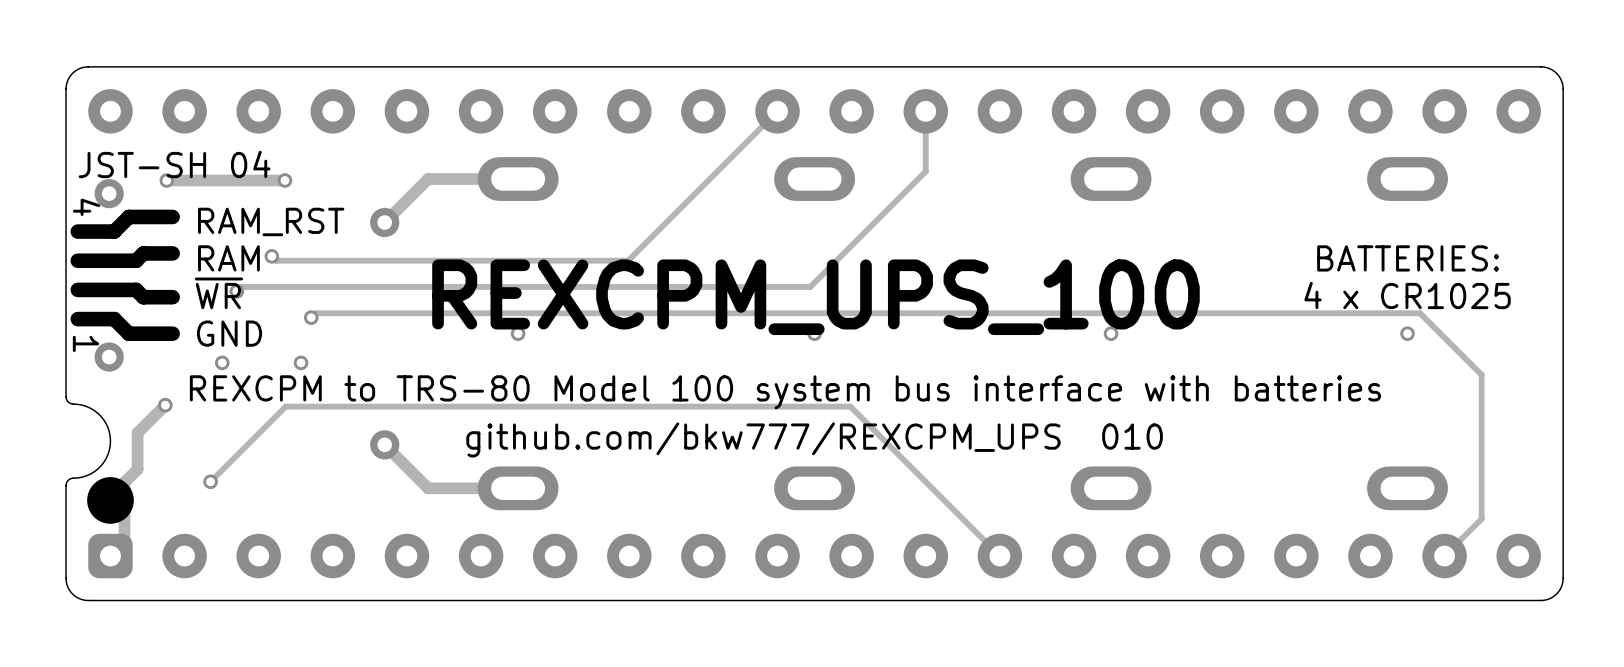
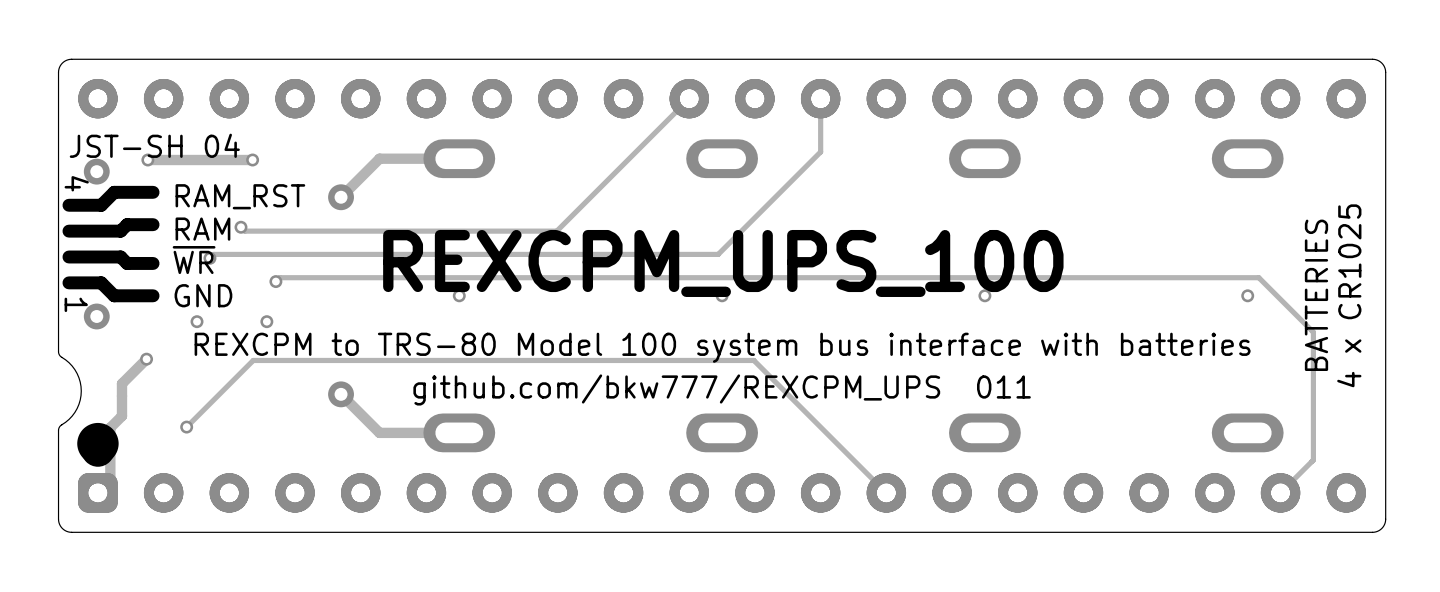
board edge: (88, 66) (1540, 66) (1549, 68) (1560, 77) (1563, 89) (1563, 578) (1561, 586) (1554, 595) (1540, 600) (88, 600) (79, 598) (70, 591) (66, 581) (66, 484) (69, 479) (86, 475) (98, 468) (108, 454) (110, 441) (108, 428) (101, 416) (86, 406) (69, 403) (66, 396) (66, 86) (68, 77) (74, 71) (88, 66) -> none
text: BATTERIES: (1408, 258) -> BATTERIES (1316, 295)
text rotation: 0° (1407, 295) -> 90° counterclockwise (1349, 295)
part: none -> (722, 295)
text position: REXCPM to TRS-80 Model 100 system bus interface with batteries (785, 392) -> REXCPM to TRS-80 Model 100 system bus interface with batteries (722, 347)
text: github.com/bkw777/REXCPM_UPS 010 (814, 439) -> github.com/bkw777/REXCPM_UPS 011 (722, 389)

